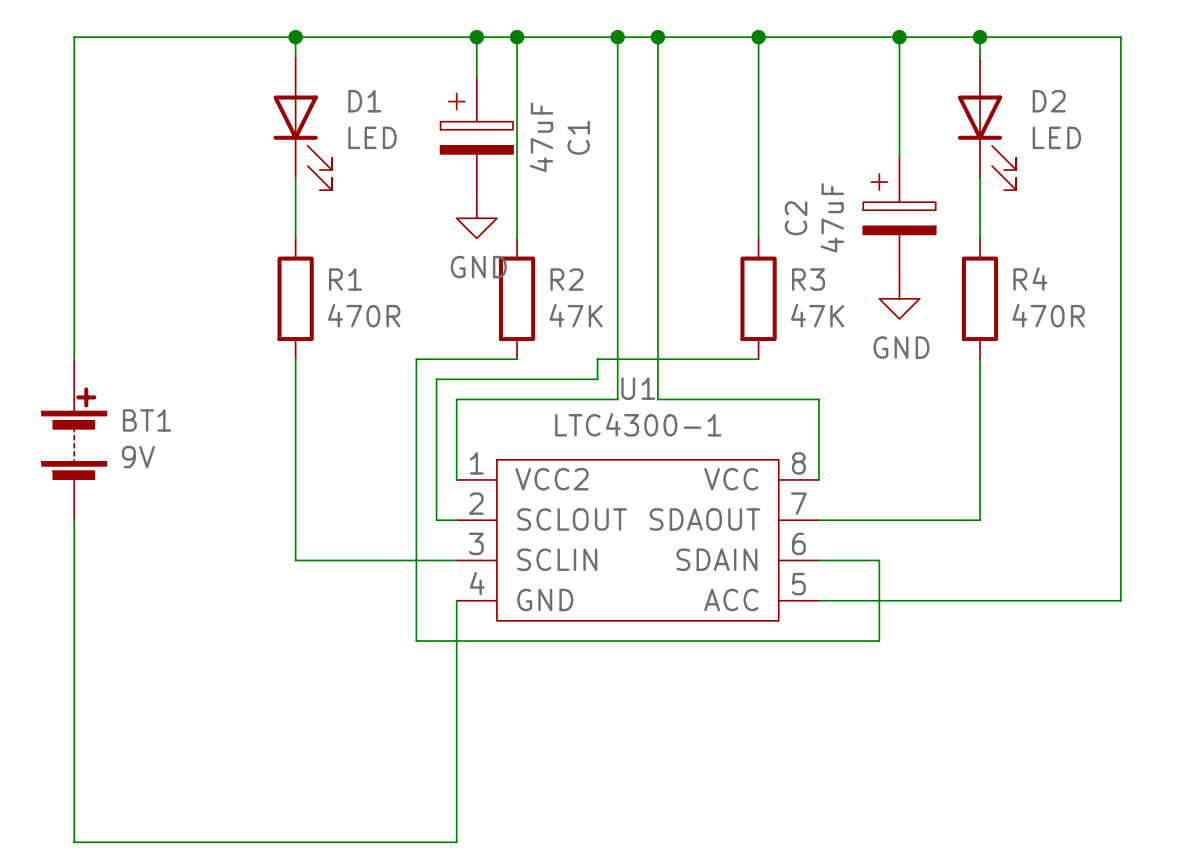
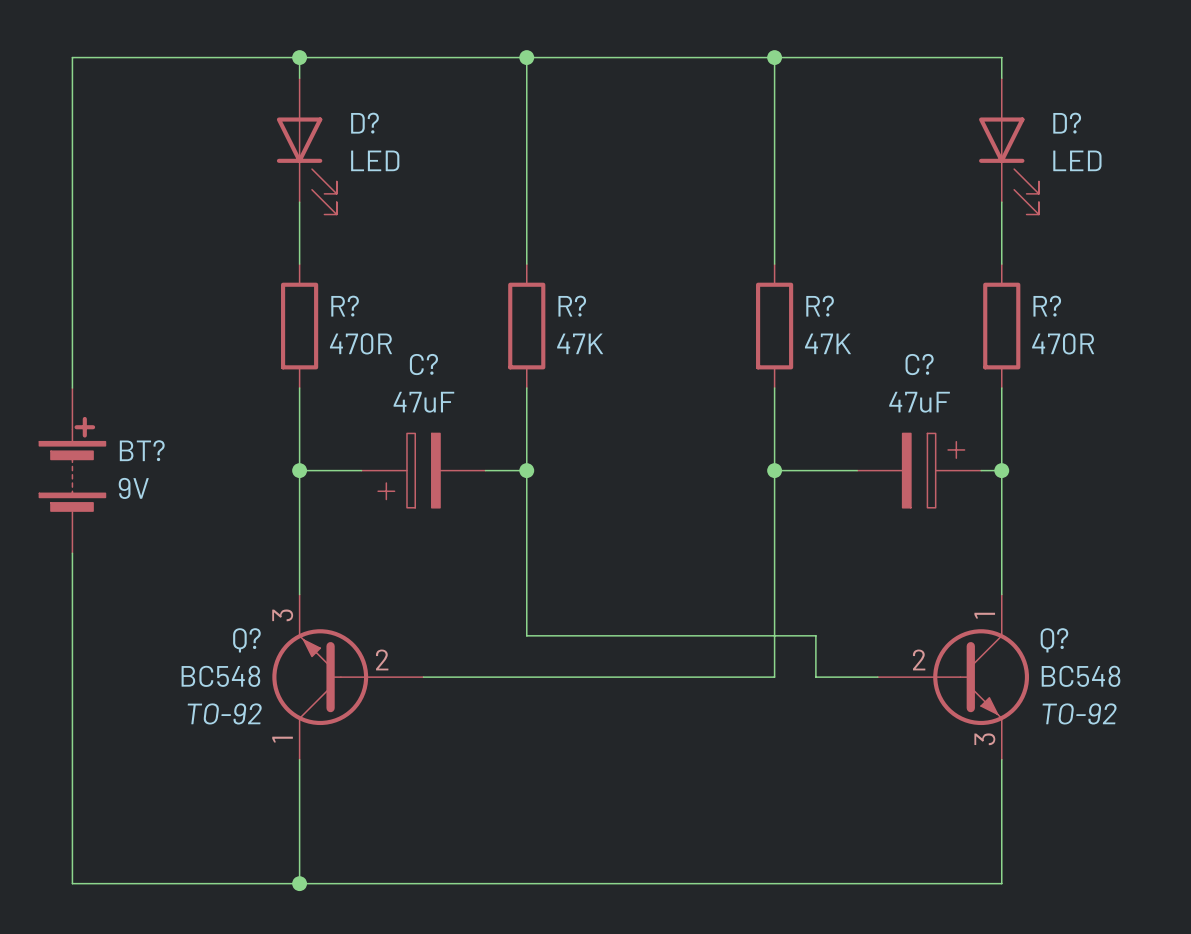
wire: (476, 37) (476, 77) -> none
junction: (476, 37) -> none
wire: (617, 37) (617, 399) (456, 399) (456, 479) -> none
junction: (617, 37) -> none
wire: (657, 37) (657, 399) (818, 399) (818, 479) -> none
junction: (657, 37) -> none
wire: (899, 37) (899, 157) -> none
junction: (899, 37) -> none
wire: (980, 37) (1120, 37) (1120, 600) (818, 600) -> none
junction: (980, 37) -> none
D1 name: D1 (364, 101) -> D? (365, 123)
D2 name: D2 (1049, 101) -> D? (1067, 123)
C1: 47uF (476, 137) -> none
power symbol: GND (476, 218) -> none
C2: 47uF (899, 218) -> none
R1 name: R1 (345, 279) -> R? (345, 306)
R2 name: R2 (566, 279) -> R? (572, 306)
R3 name: R3 (808, 279) -> R? (820, 306)
R4 name: R4 (1030, 279) -> R? (1047, 306)
power symbol: GND (899, 298) -> none
wire: (517, 359) (416, 359) (416, 640) -> (526, 388) (526, 635) (815, 635) (815, 677)
wire: (758, 359) (597, 359) (597, 379) (436, 379) (436, 520) (456, 520) -> none
BT1 name: BT1 (147, 420) -> BT? (142, 450)
wire: none -> (299, 470) (361, 470)
junction: none -> (299, 470)
C?: none -> 47uF (423, 470)
wire: none -> (485, 470) (526, 470)
junction: none -> (526, 470)
wire: none -> (774, 470) (857, 470)
junction: none -> (774, 470)
C?: none -> 47uF (919, 470)
wire: none -> (981, 470) (1001, 470)
junction: none -> (1001, 470)
wire: (818, 520) (980, 520) -> (1001, 594) (1001, 553)
U1: LTC4300-1 (637, 540) -> none
wire: (295, 560) (456, 560) -> none
wire: (818, 560) (879, 560) (879, 640) (859, 640) -> none
wire: (456, 600) (456, 842) -> (1001, 759) (1001, 883) (464, 883)
Q?: none -> BC548 (347, 677)
wire: (758, 640) (798, 640) -> (774, 677) (774, 388)
Q?: none -> BC548 (953, 677)
wire: none -> (299, 759) (299, 883)
junction: none -> (299, 883)

